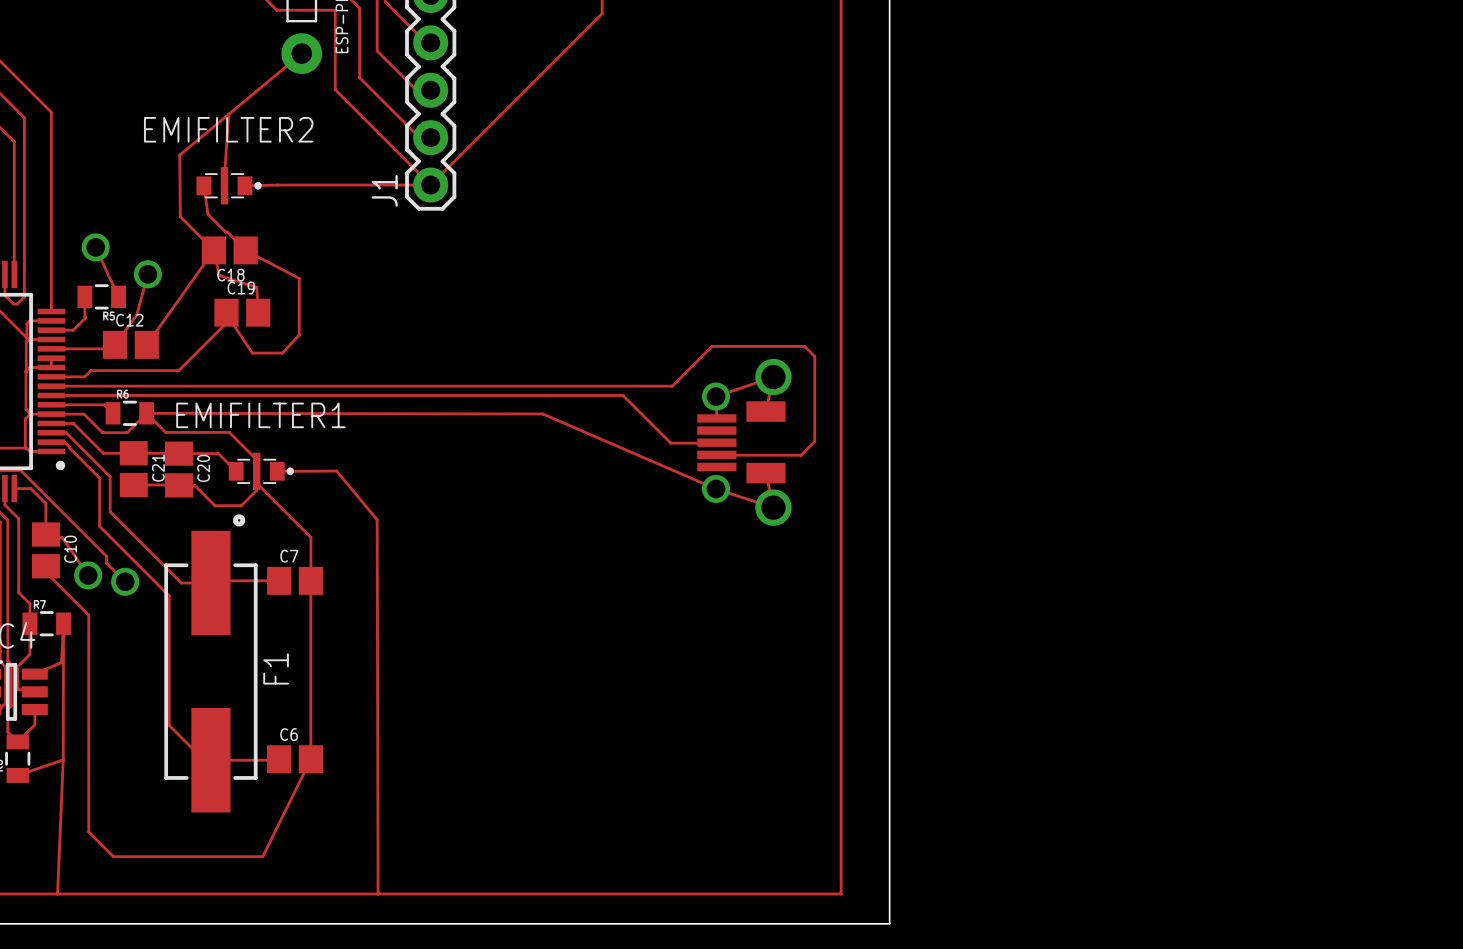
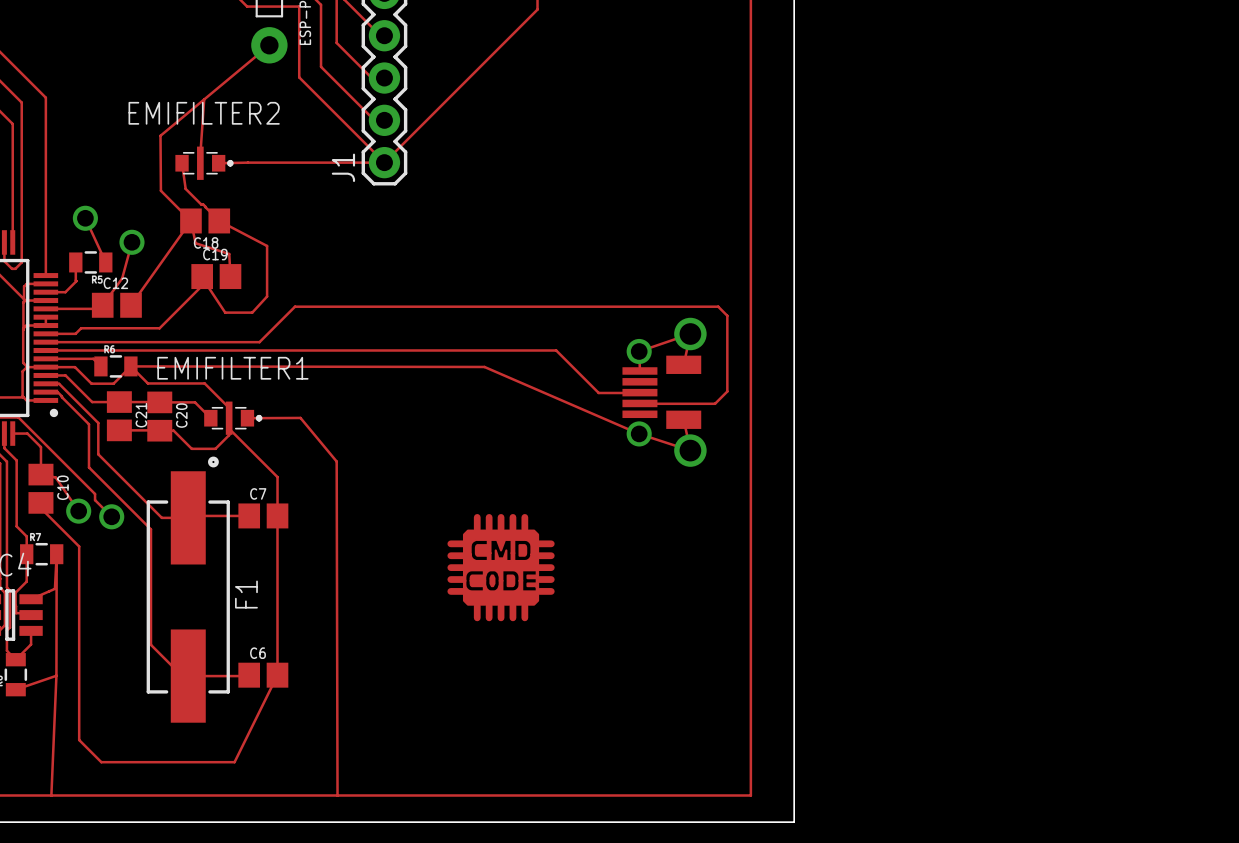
track: (711, 346) (672, 386) (290, 386) -> (635, 306) (295, 306) (259, 342)
drawing: none -> [447, 514, 555, 622]

